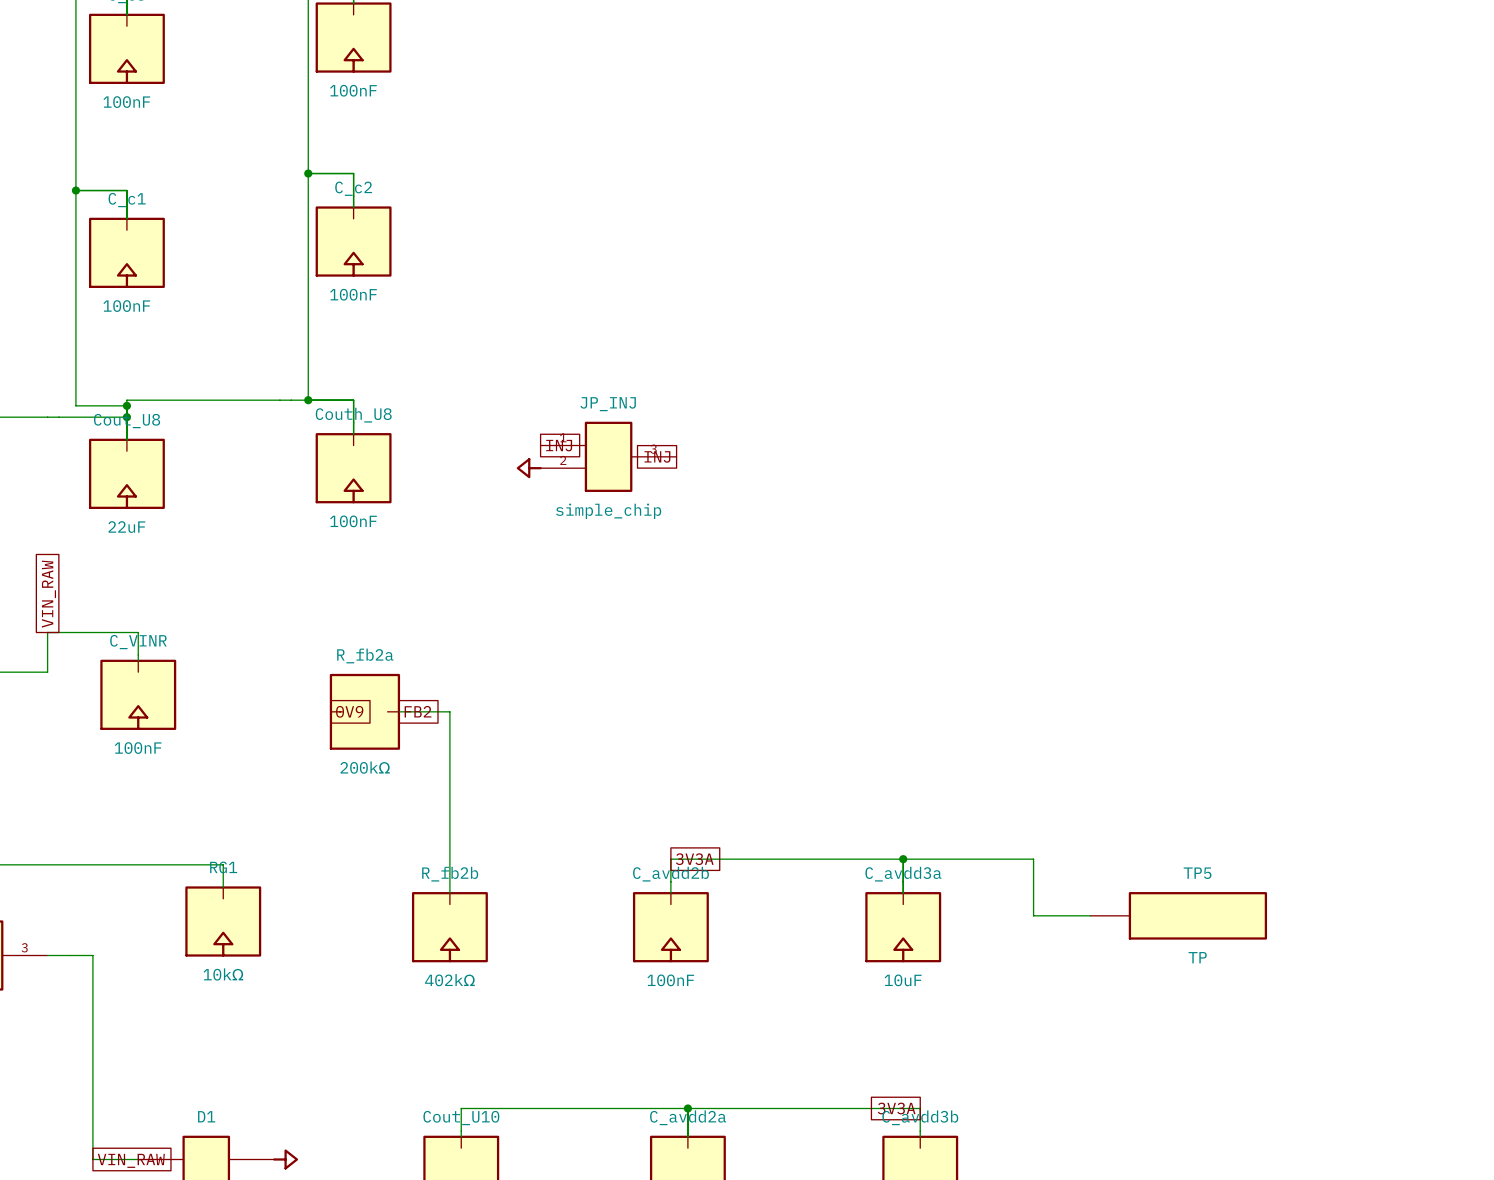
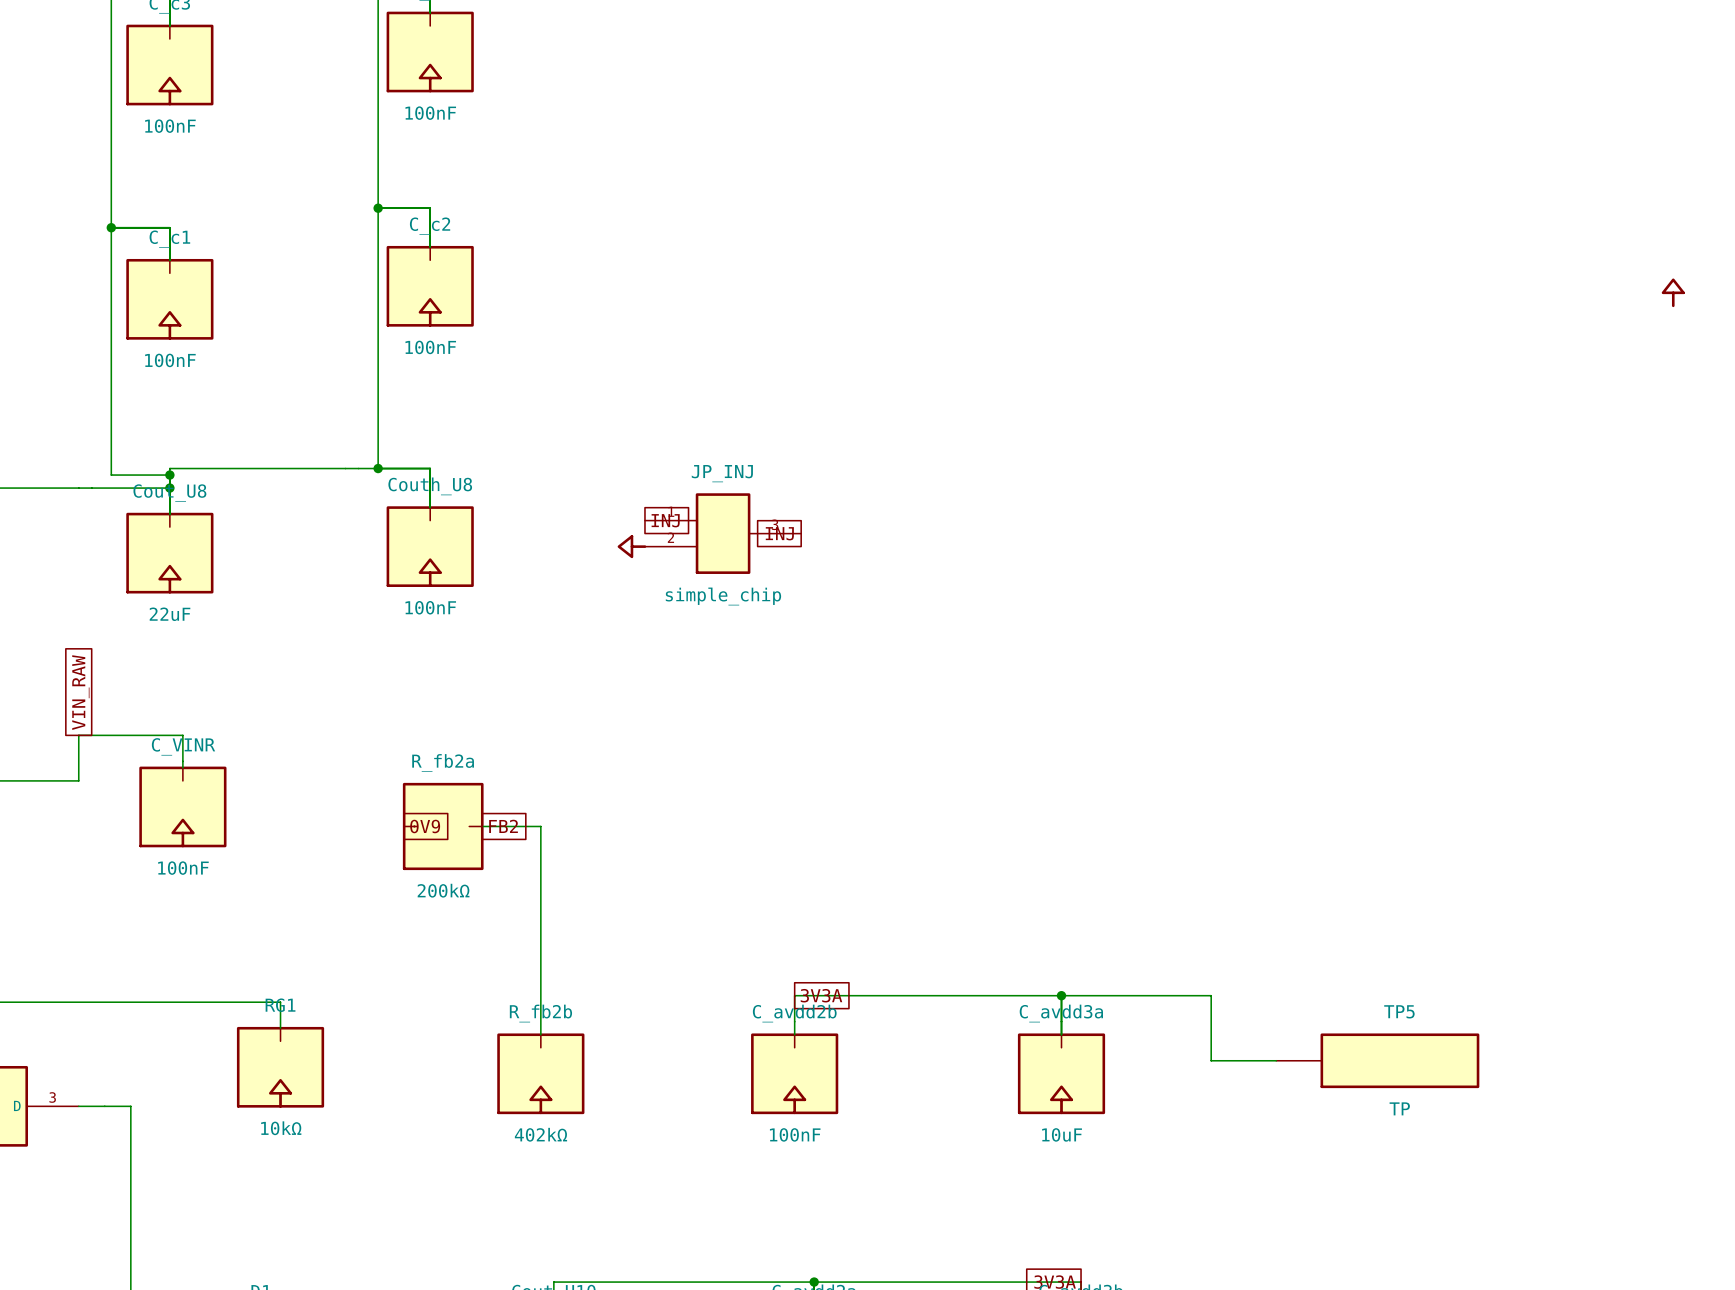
power symbol: none -> (1673, 292)

